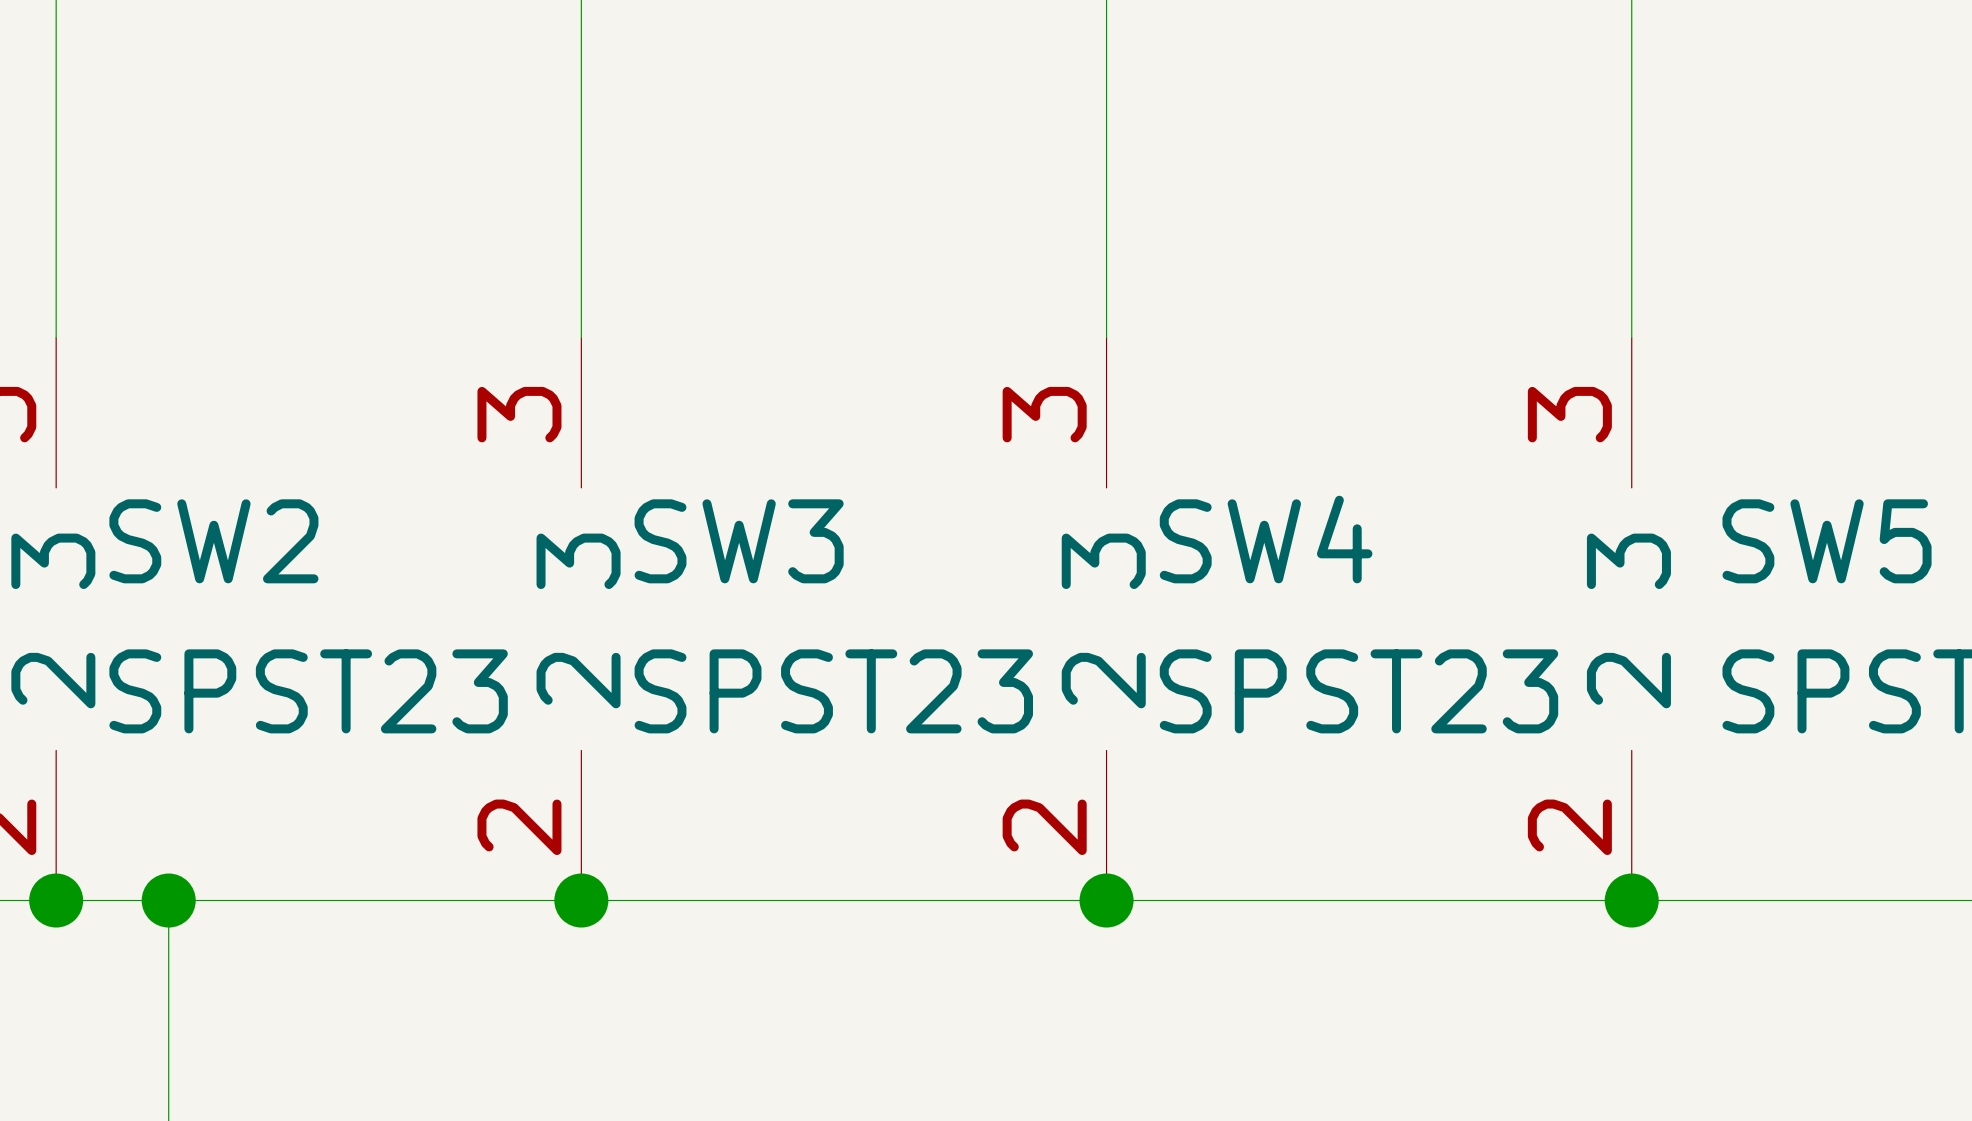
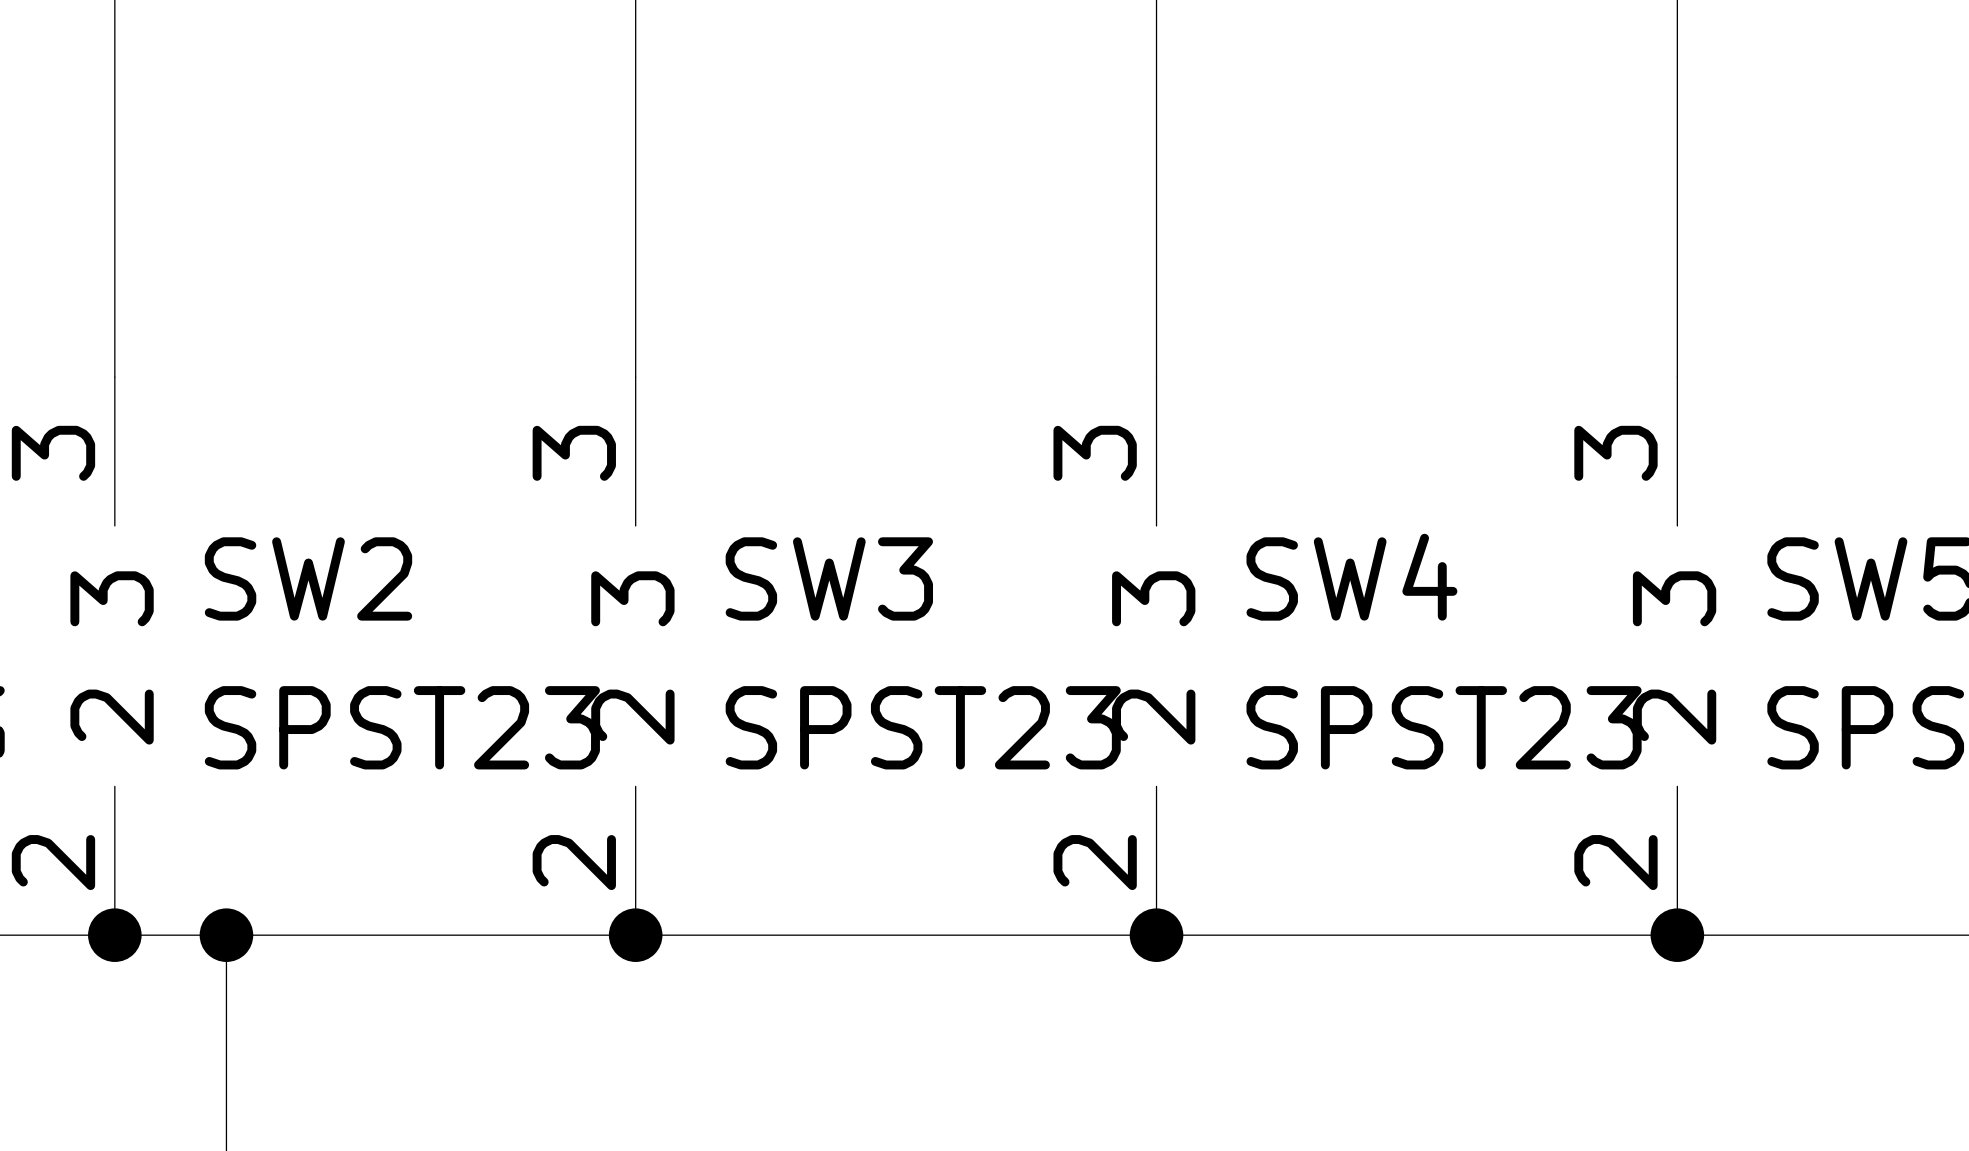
SW4 name position: SW4 (1266, 539) -> SW4 (1351, 577)
SW2 name position: SW2 (213, 541) -> SW2 (308, 578)
SW3 name position: SW3 (739, 541) -> SW3 (829, 578)
SW2 value position: SPST23 (308, 691) -> SPST23 (402, 727)
SW3 value position: SPST23 (833, 691) -> SPST23 (923, 727)
SW4 value position: SPST23 (1358, 691) -> SPST23 (1444, 727)

